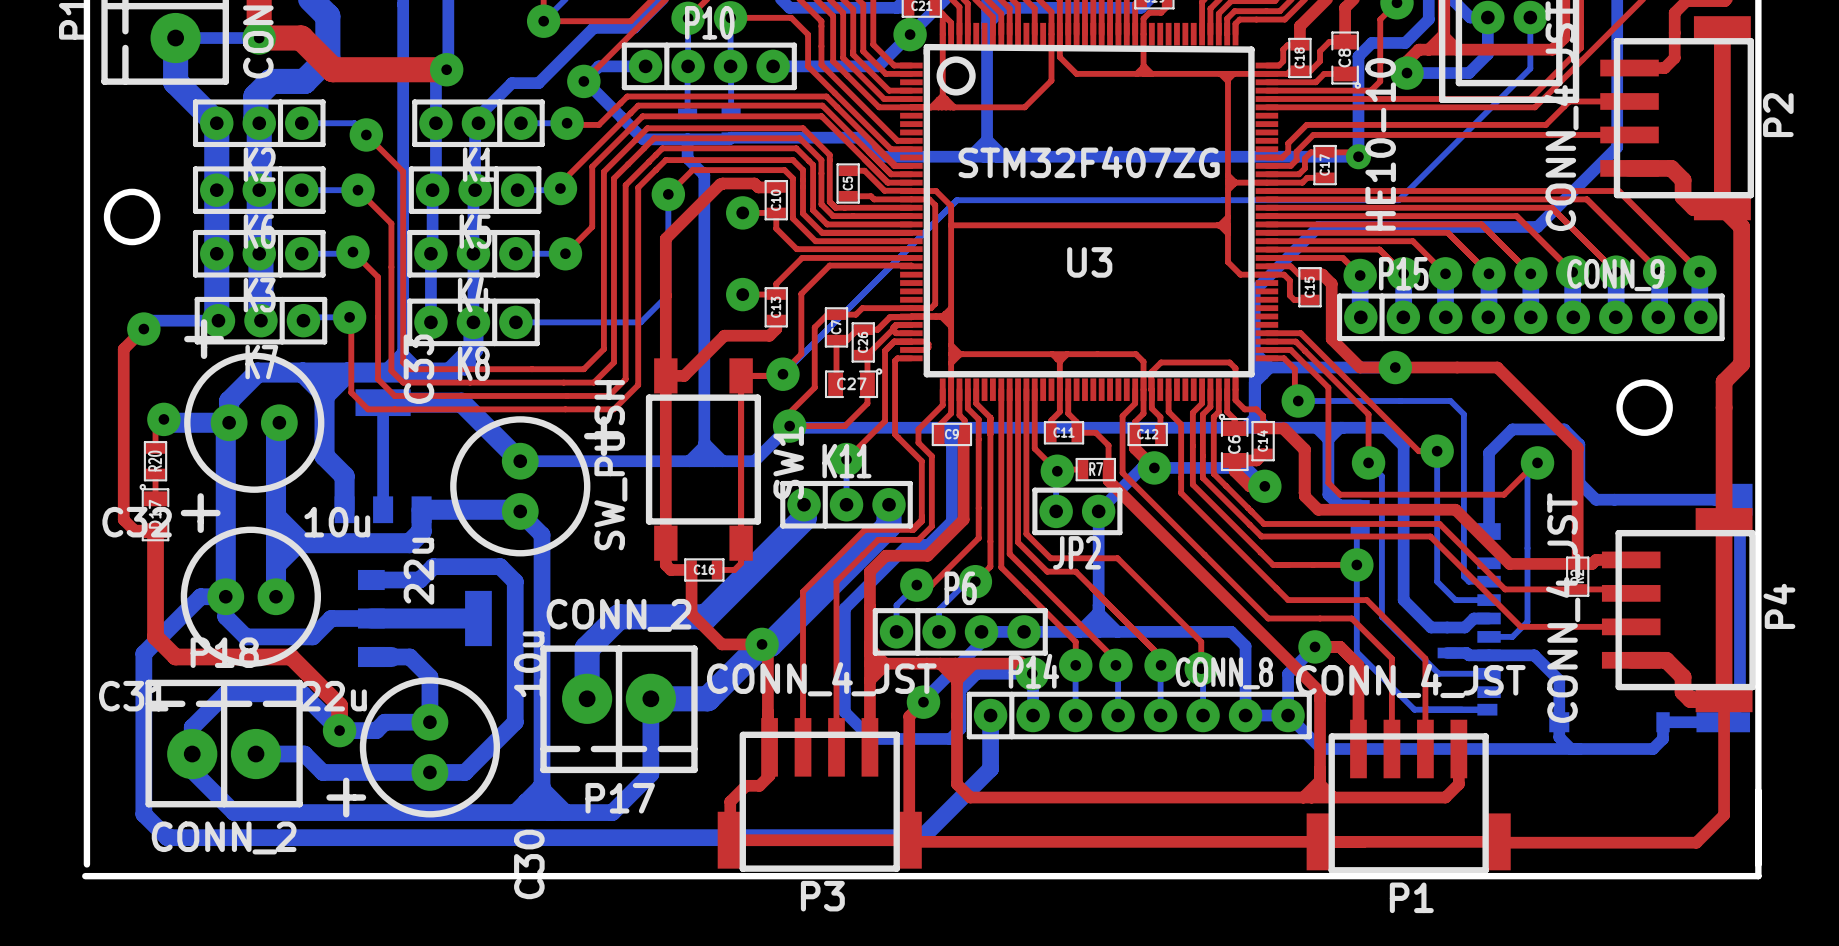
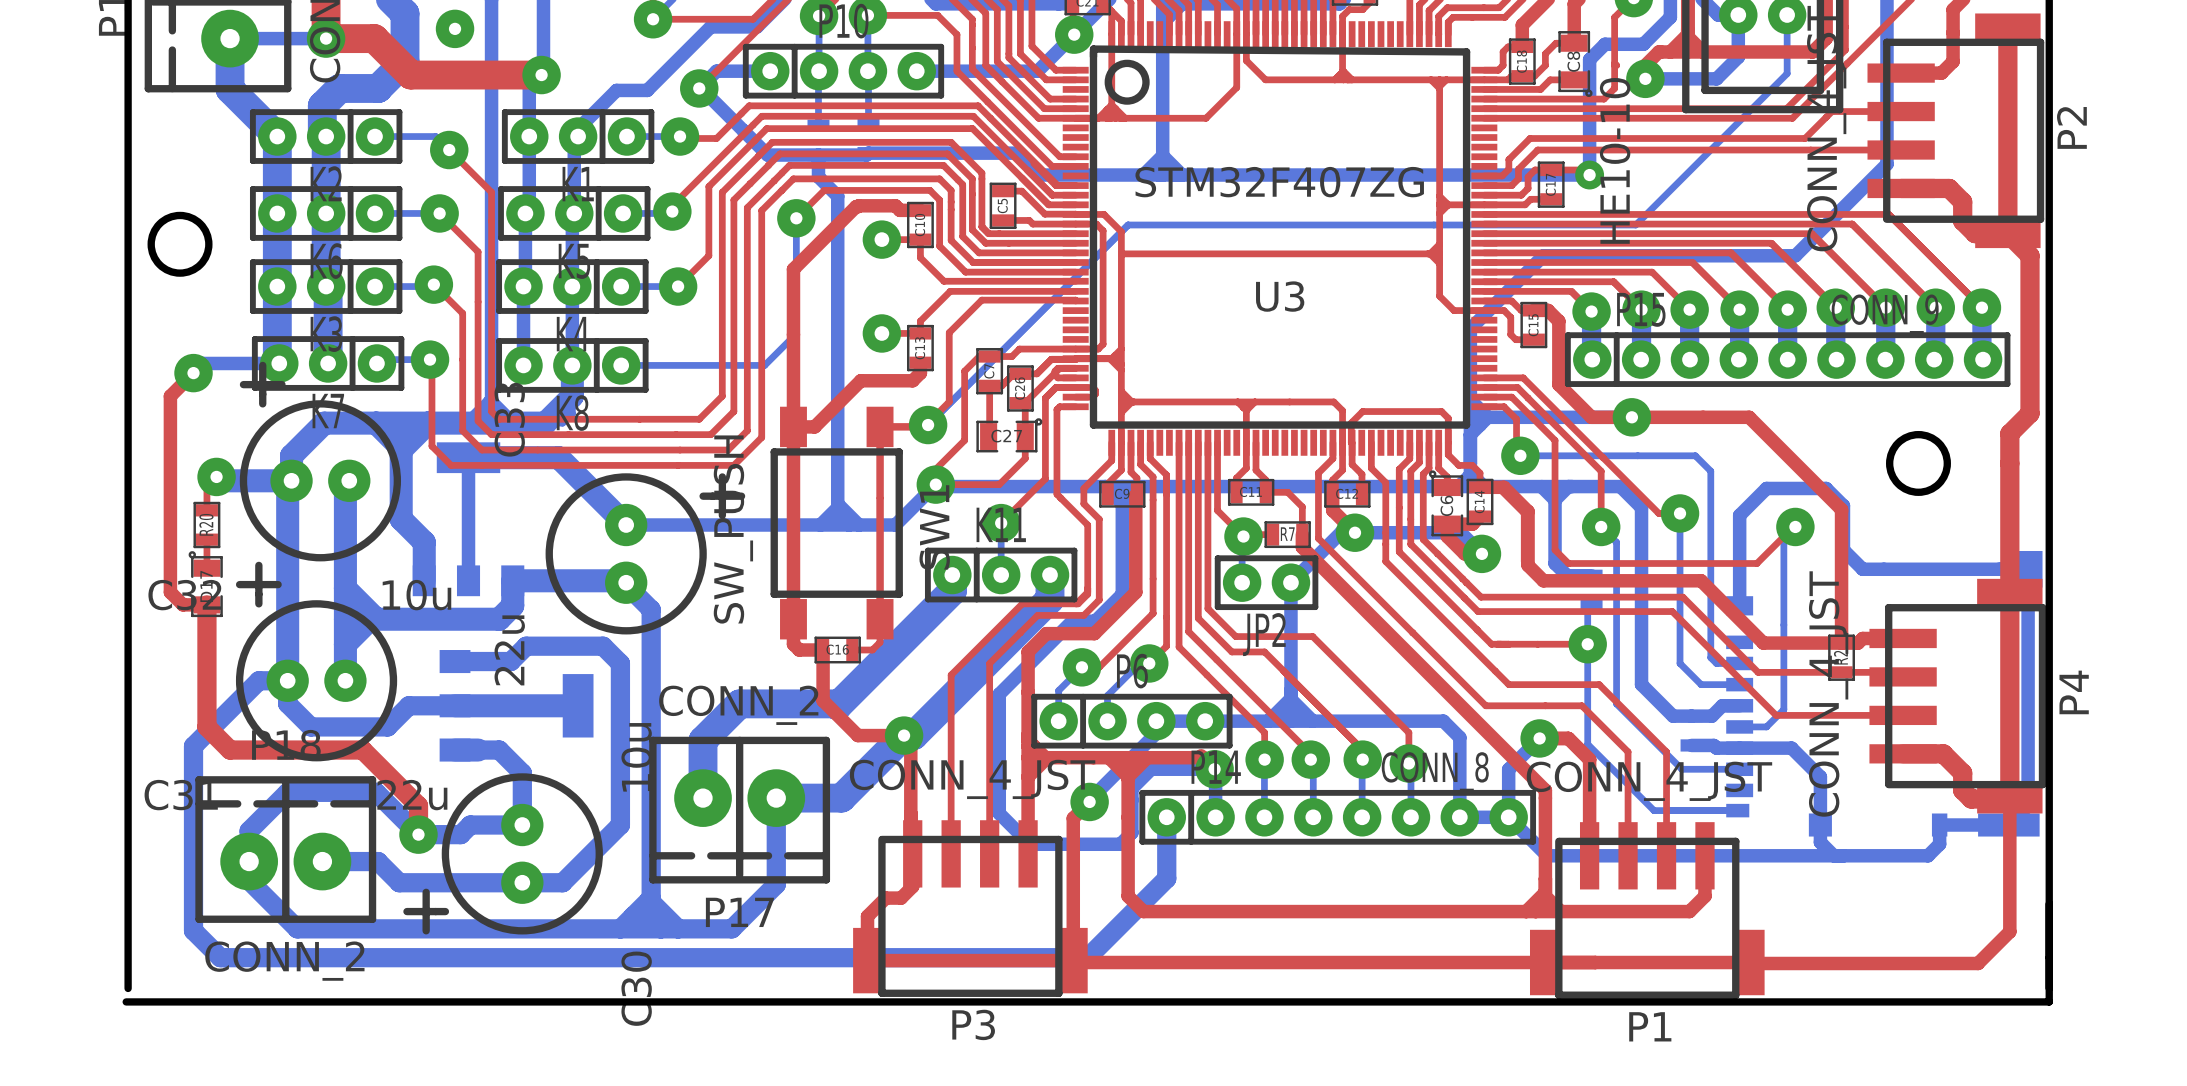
via: none -> (455, 28)

